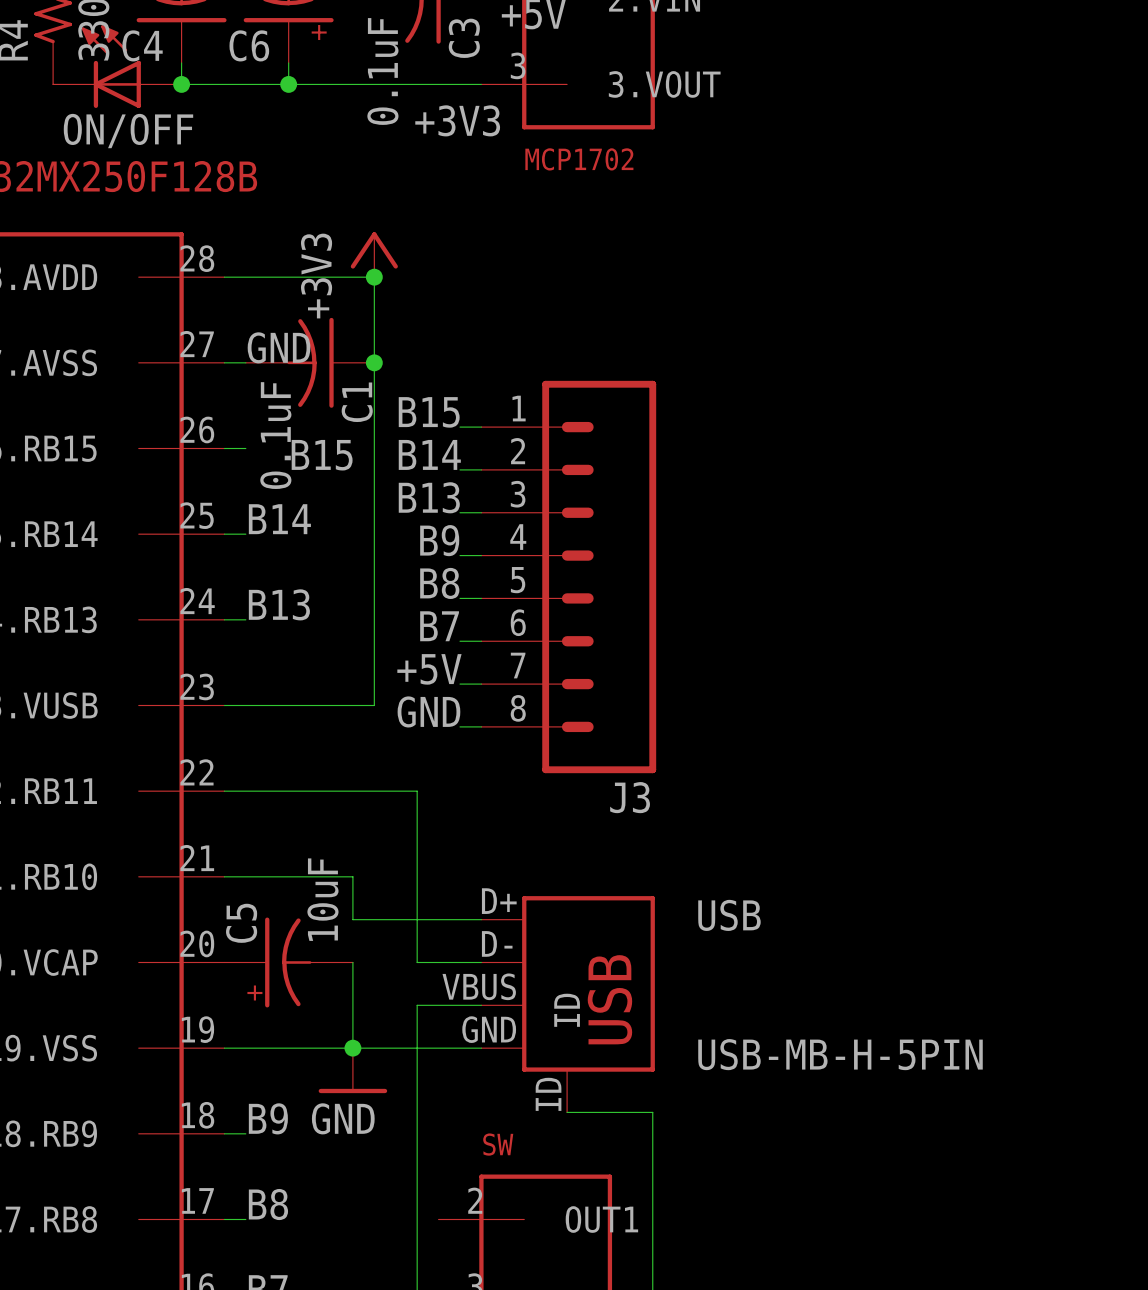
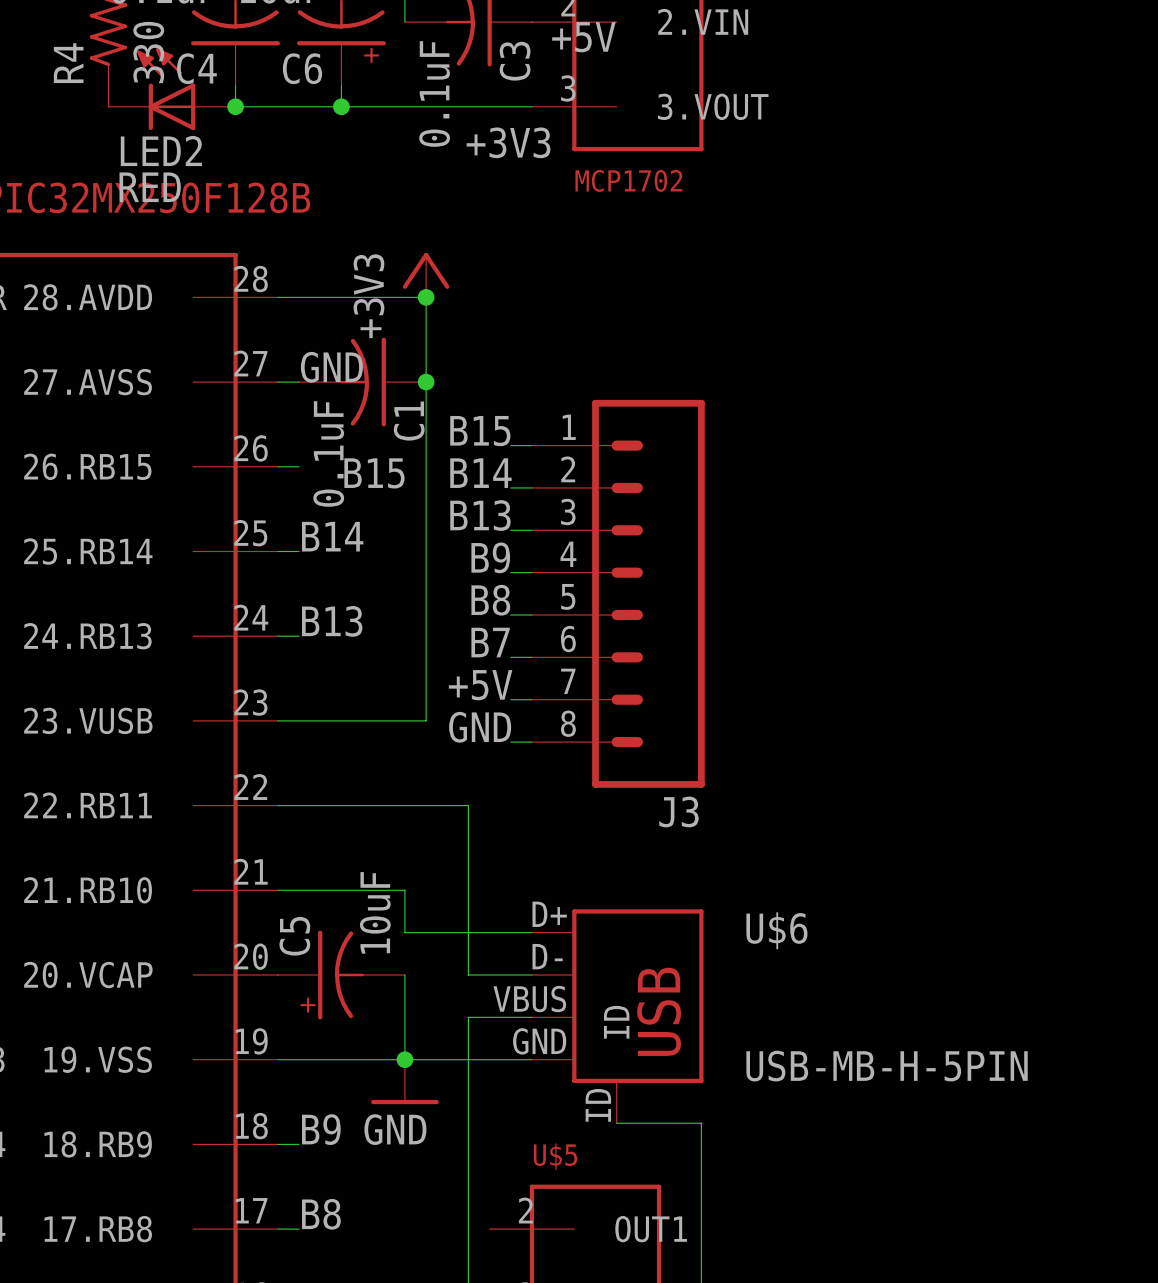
ON/OFF name: ON/OFF (128, 131) -> LED2 (161, 151)
ON/OFF value: none -> RED (150, 187)
USB name: USB (729, 915) -> U$6 (776, 930)
SW name: SW (498, 1144) -> U$5 (555, 1156)

